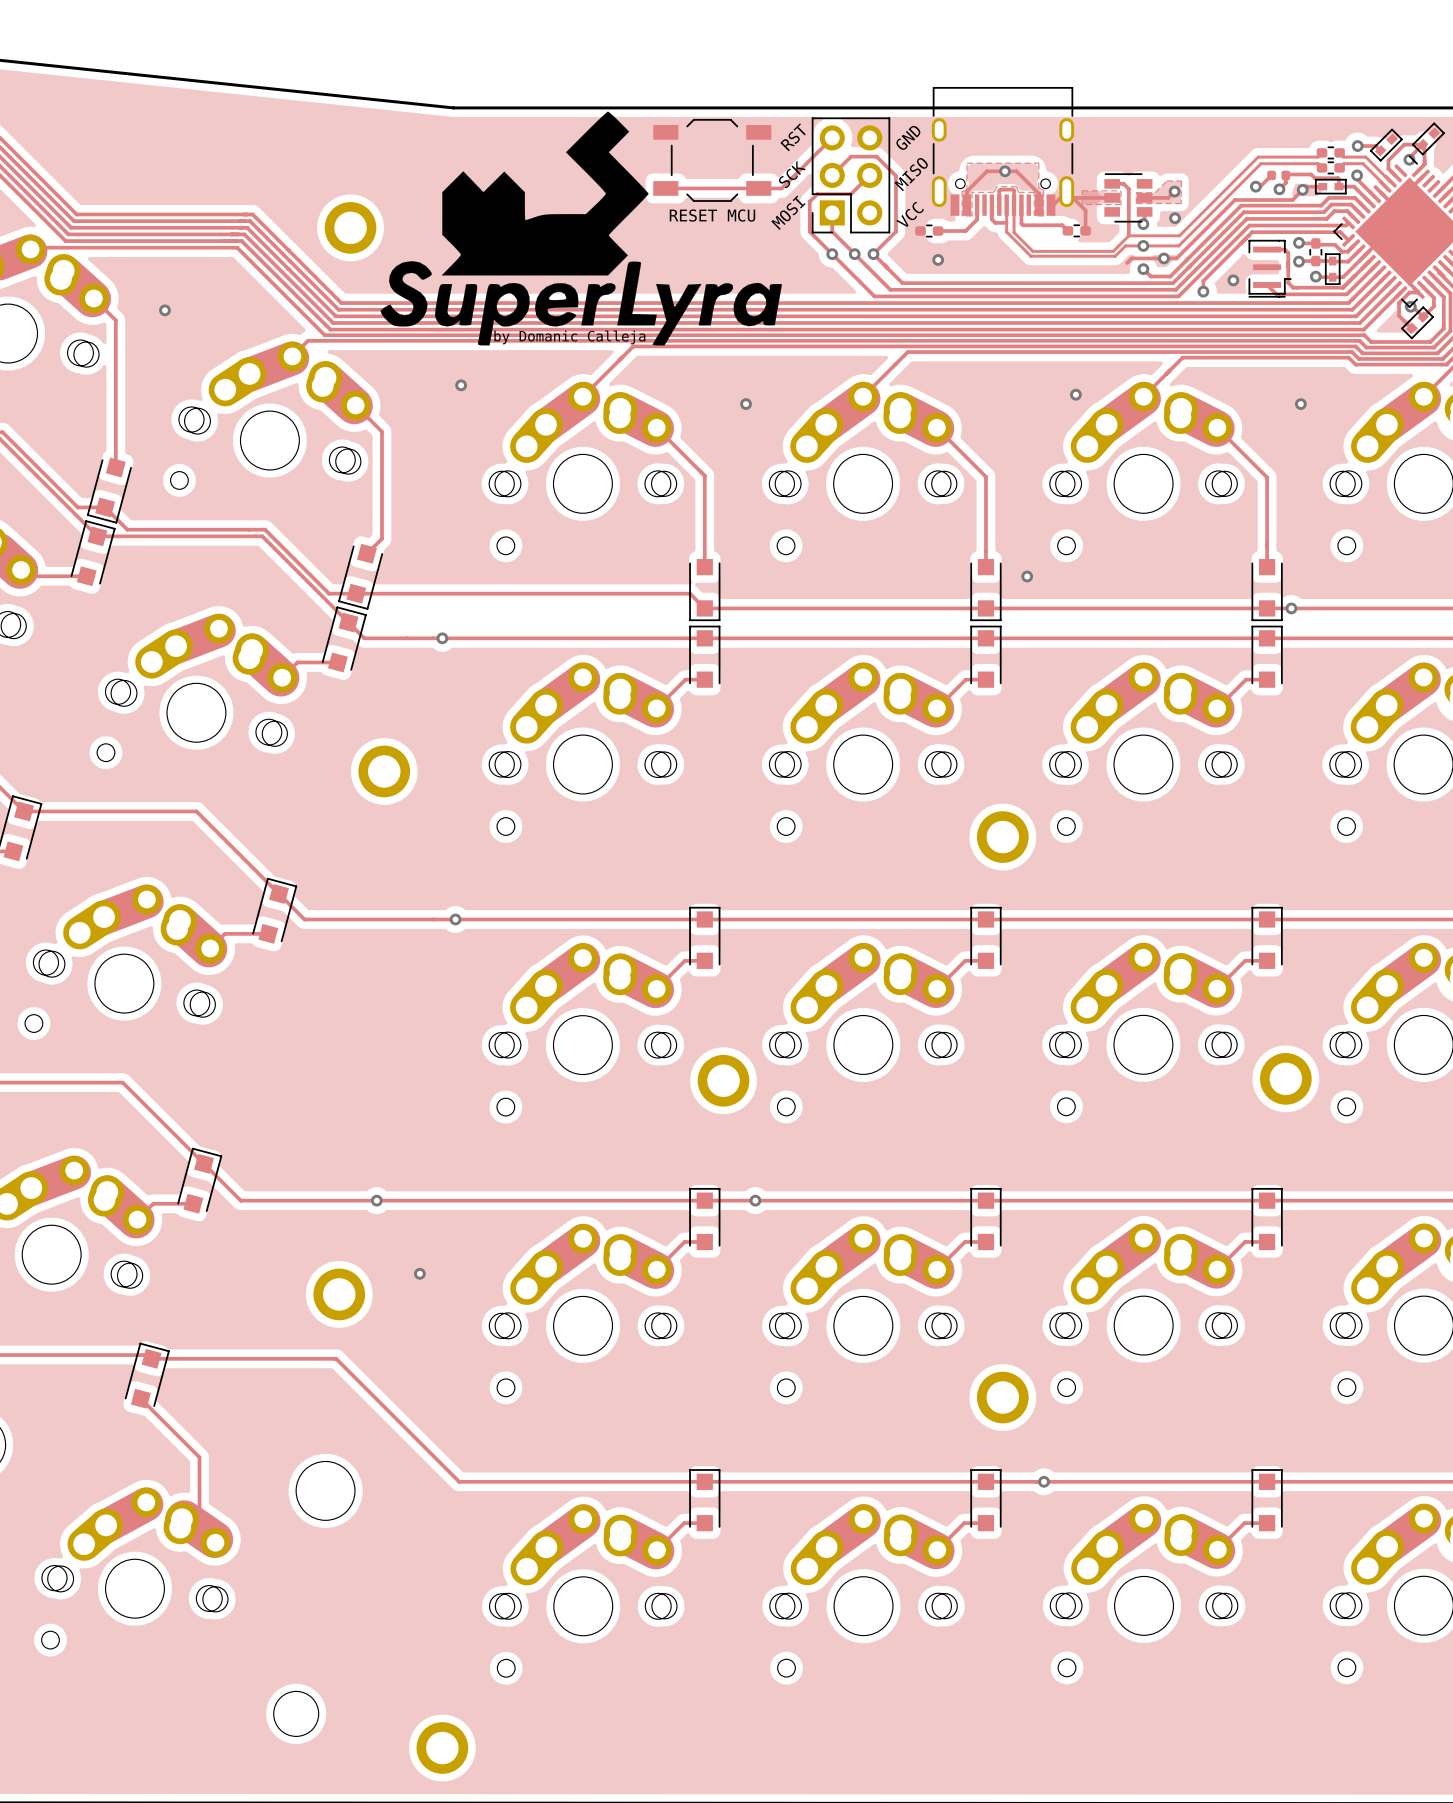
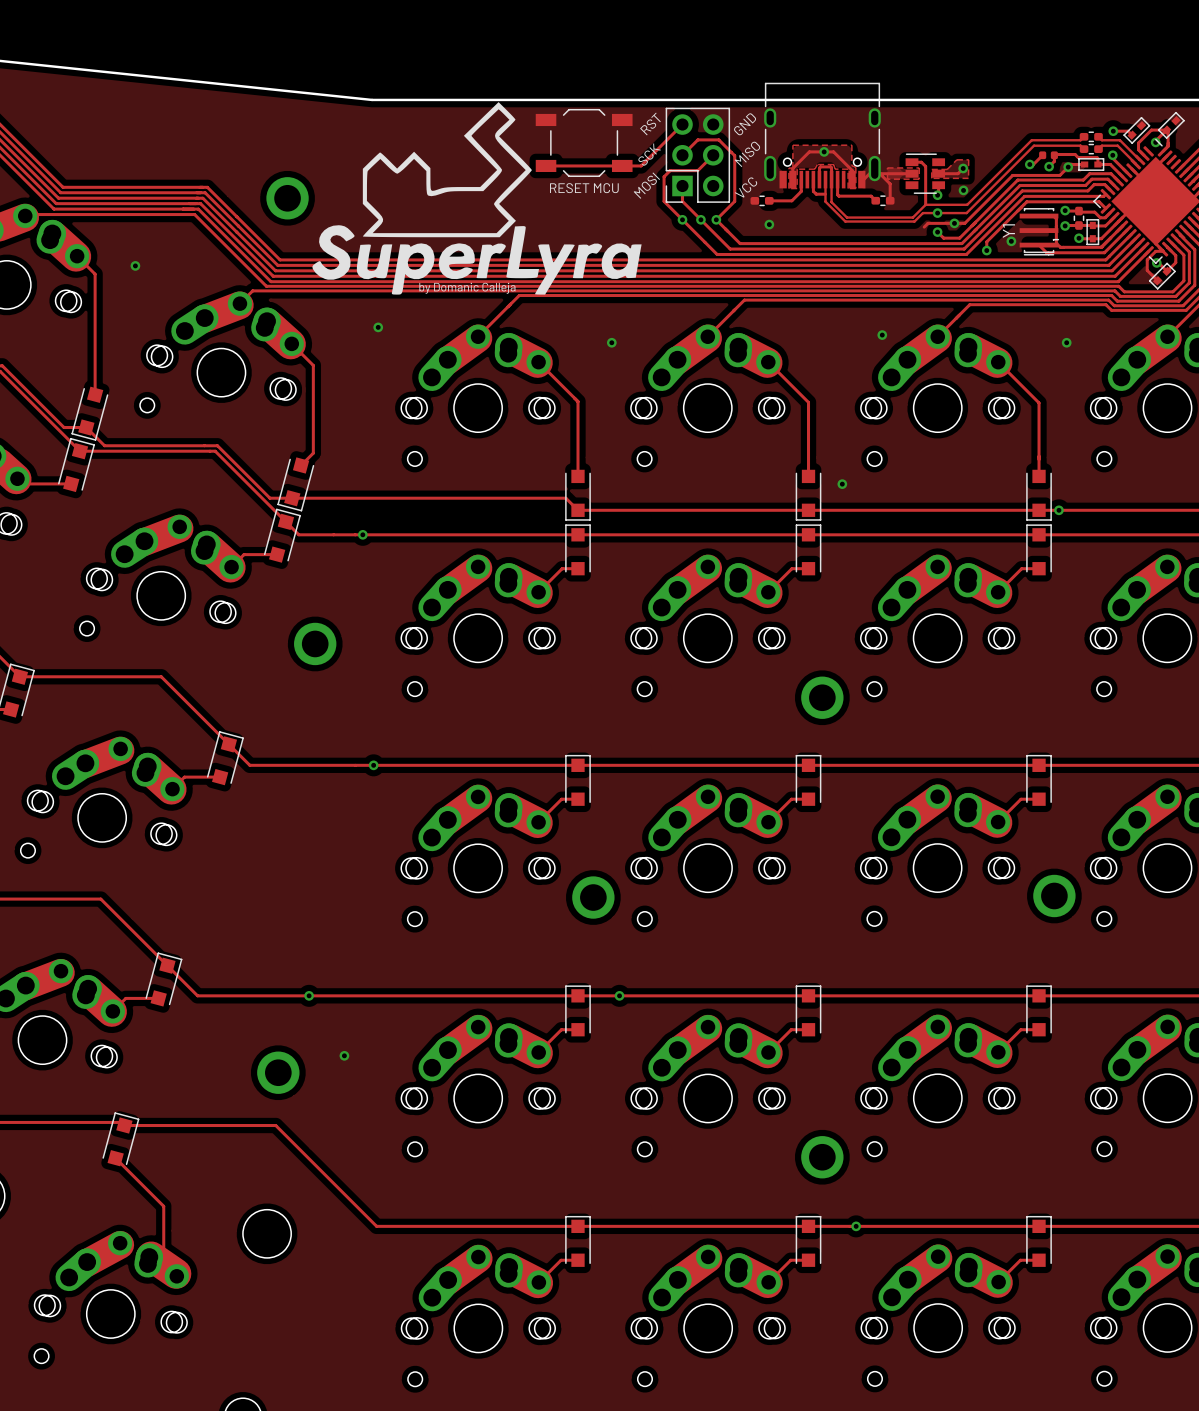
drawing shape: [380, 111, 783, 346] -> [312, 102, 642, 295]
Y1: none -> (1039, 231)
part: (1270, 268) -> none

